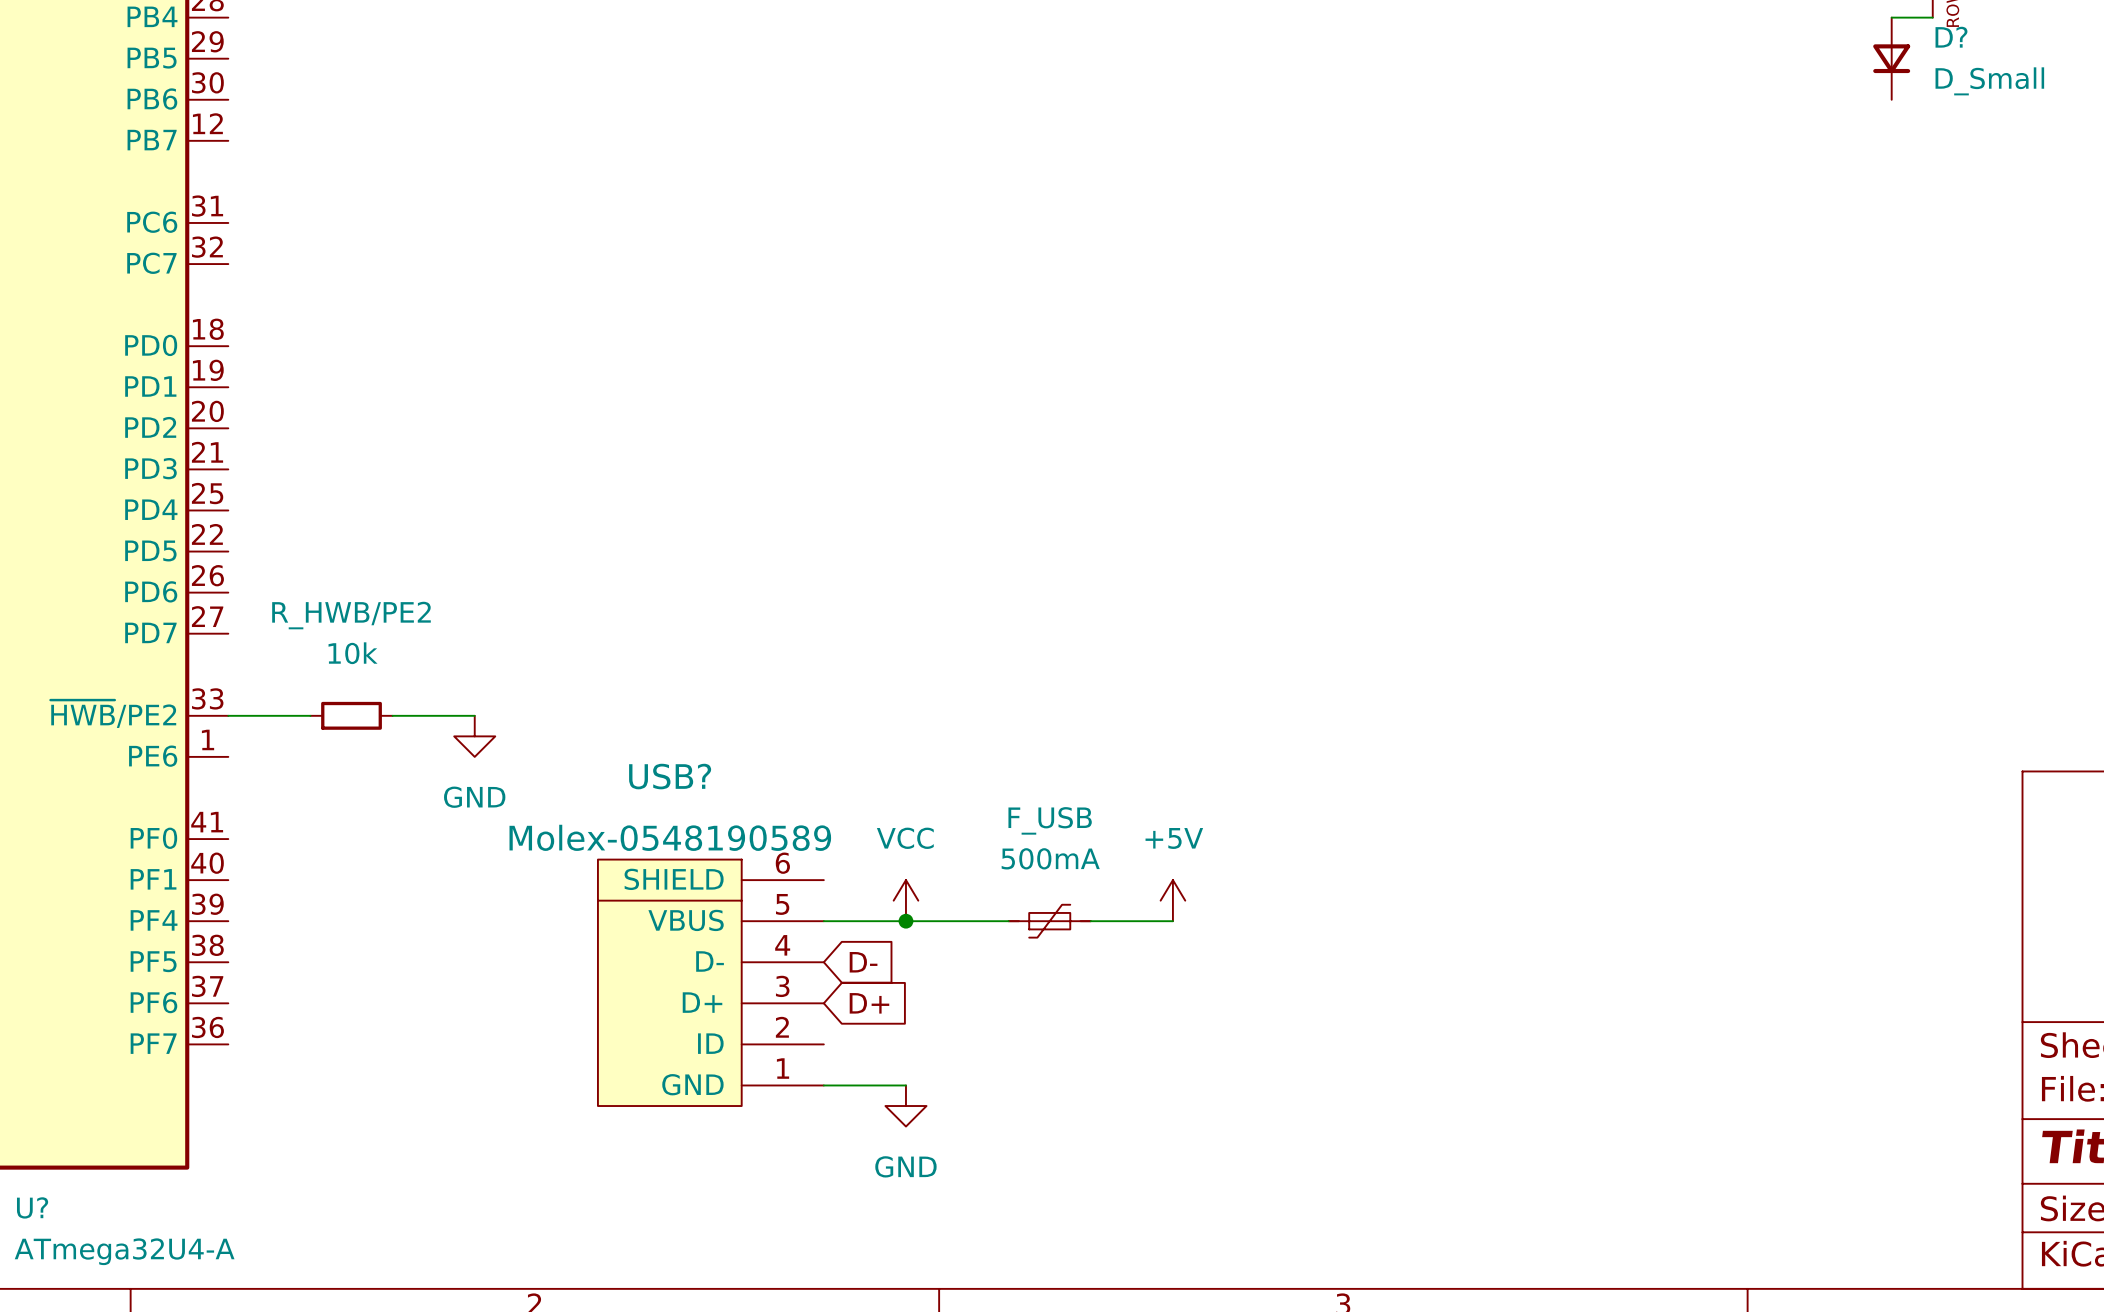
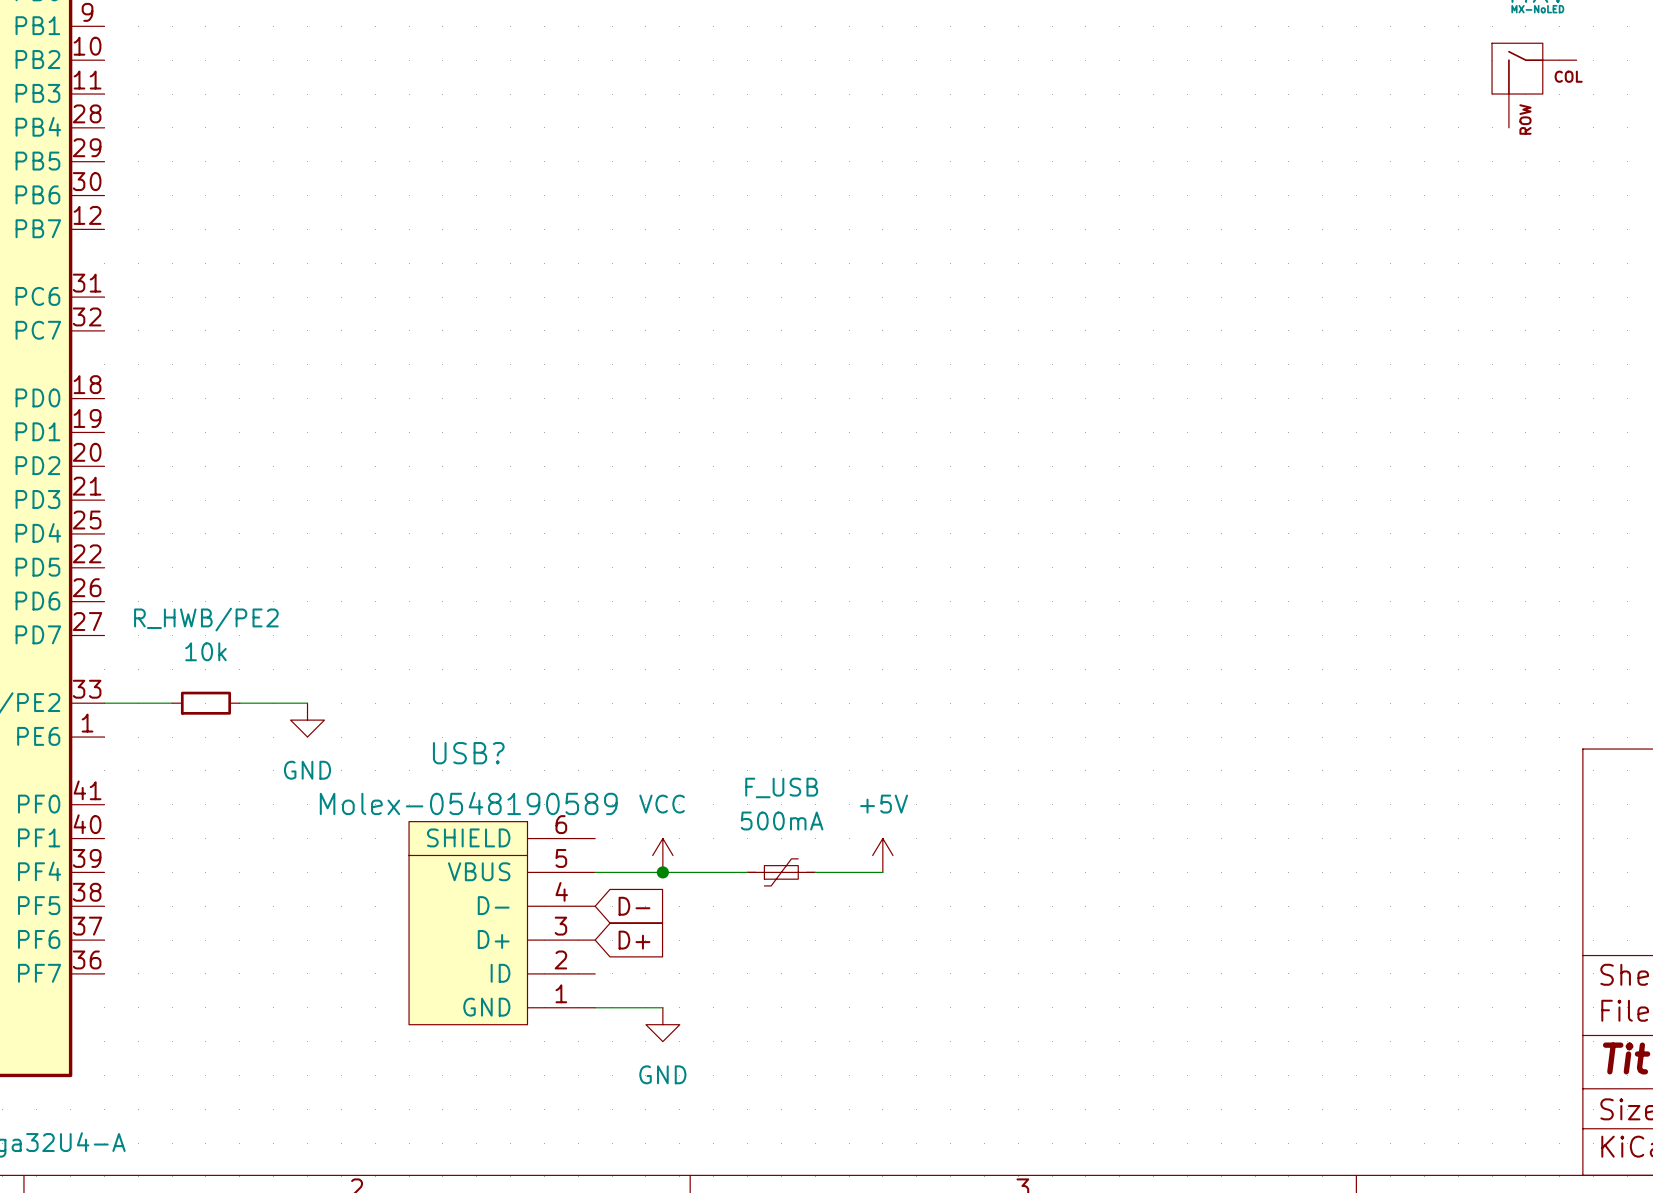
wire: (1891, 17) (1932, 17) -> none
D?: D_Small (1891, 58) -> none

